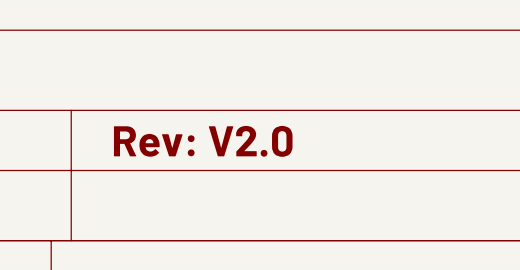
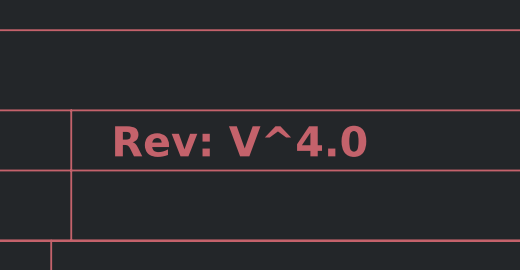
title block: Rev: V2.0 (203, 141) -> Rev: V^4.0 (240, 141)

